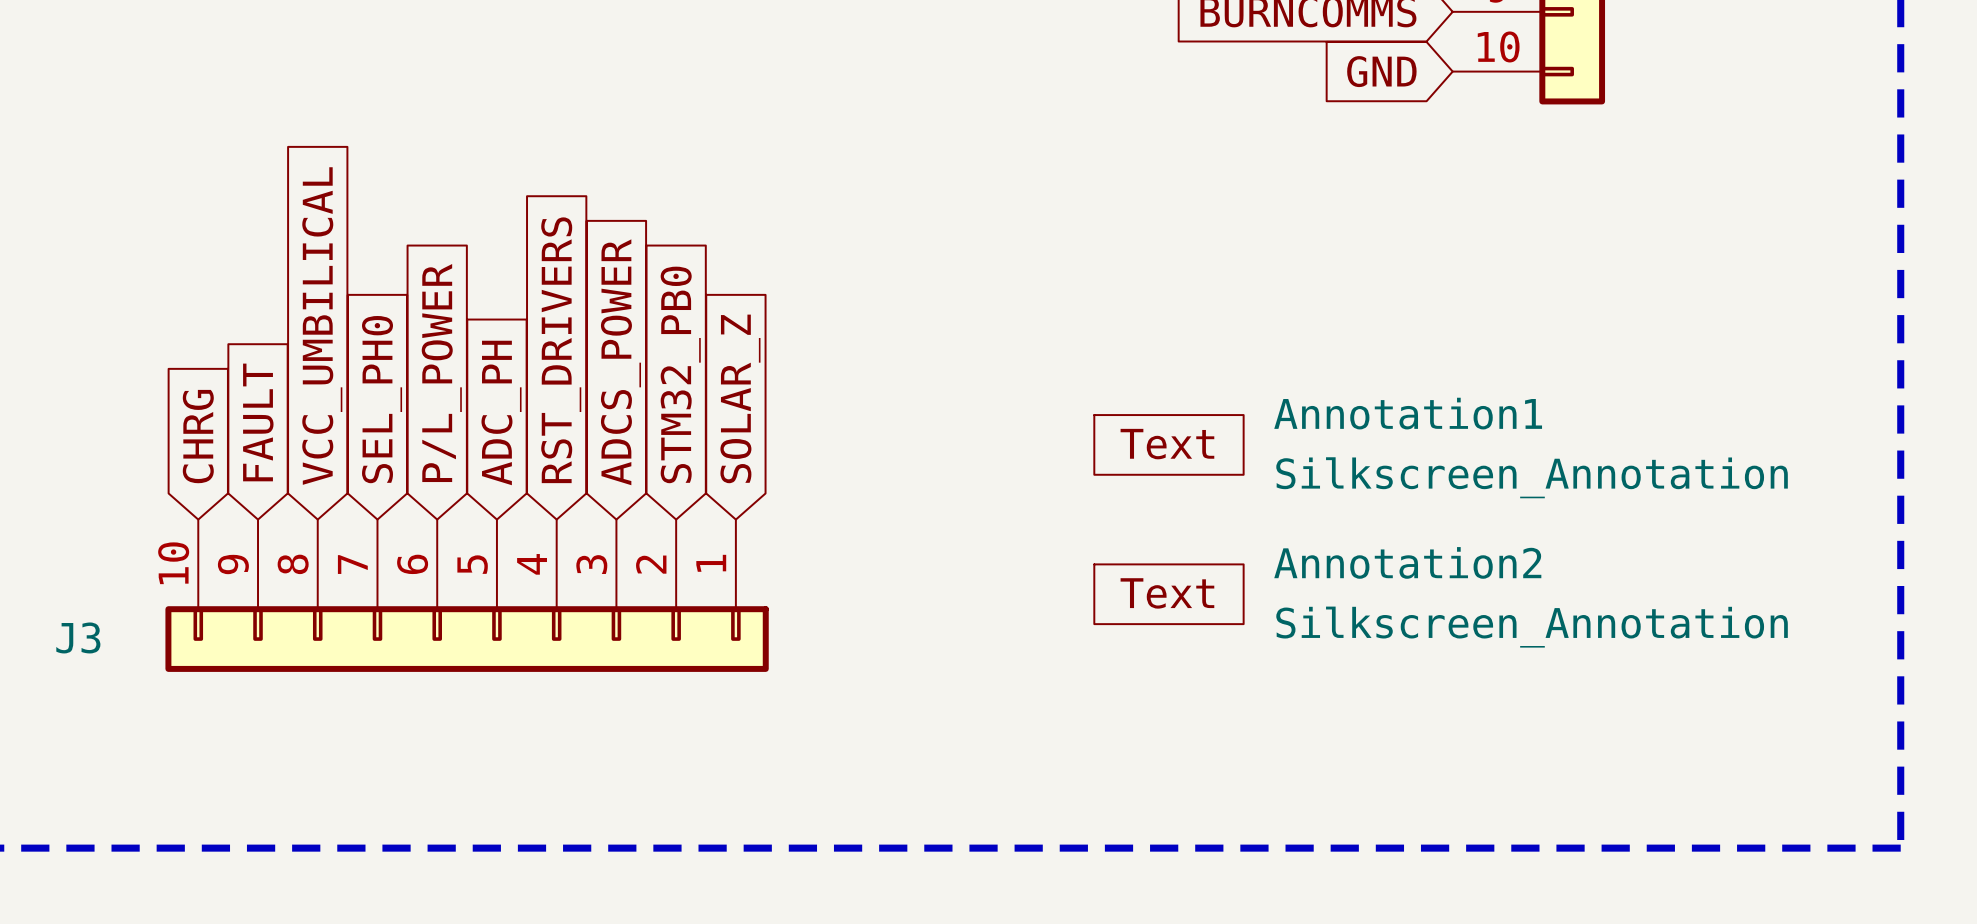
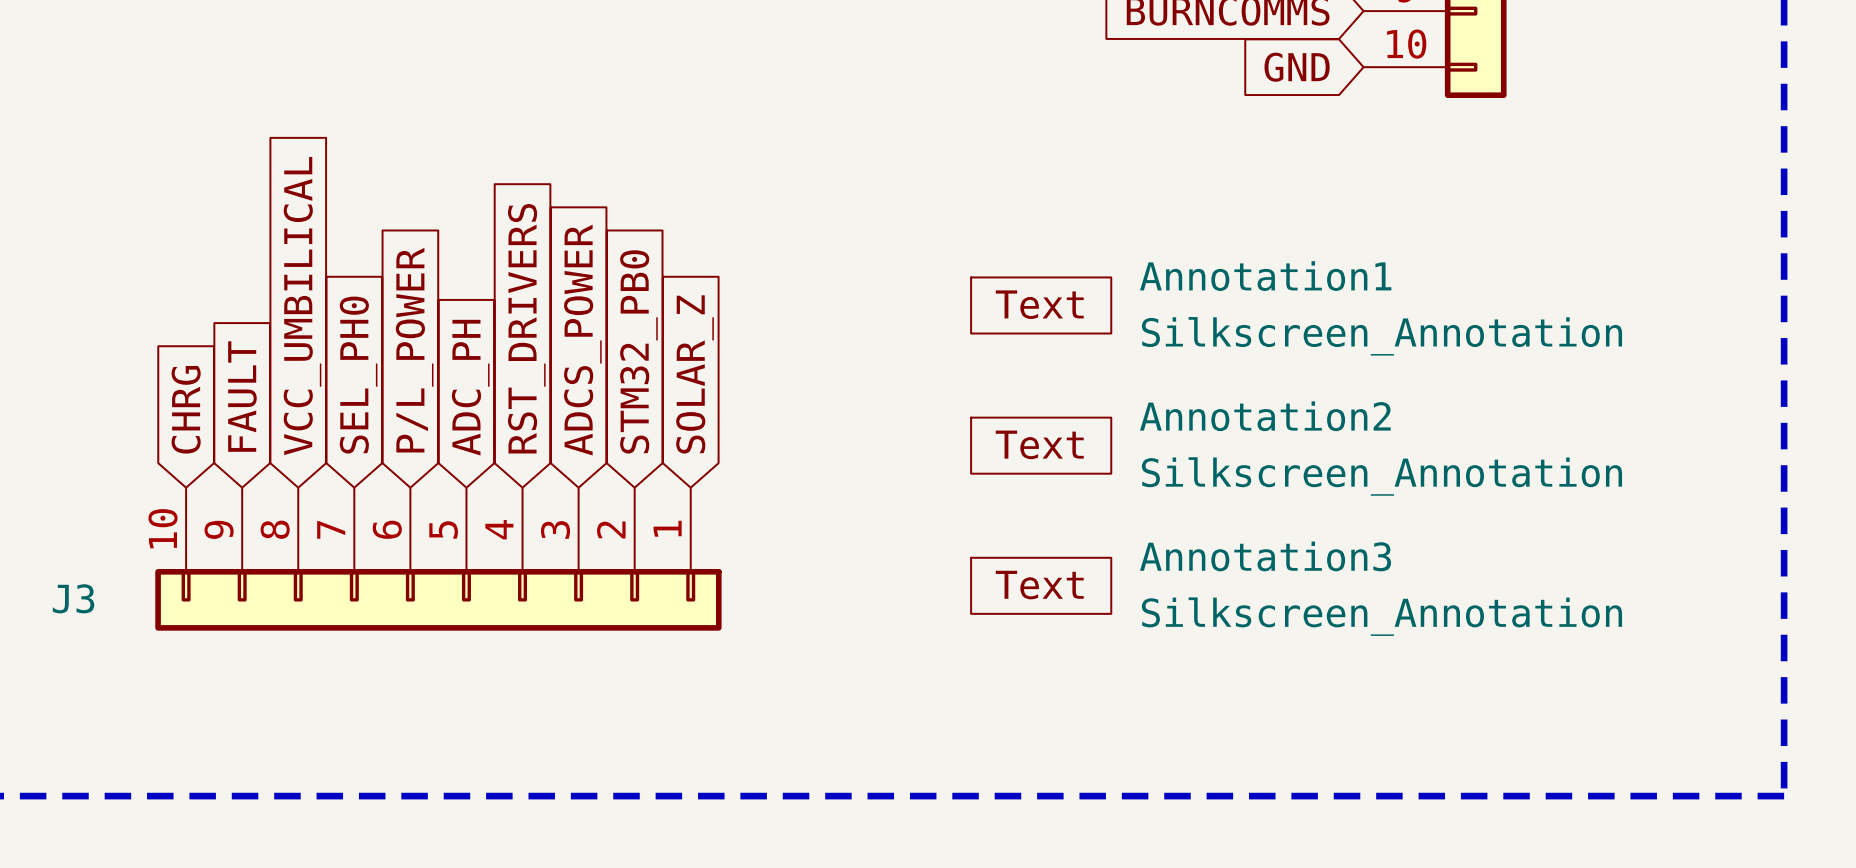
Annotation1 position: (1168, 444) -> (1041, 305)
Annotation2 position: (1168, 594) -> (1041, 445)
Annotation3: none -> Silkscreen_Annotation (1041, 585)

